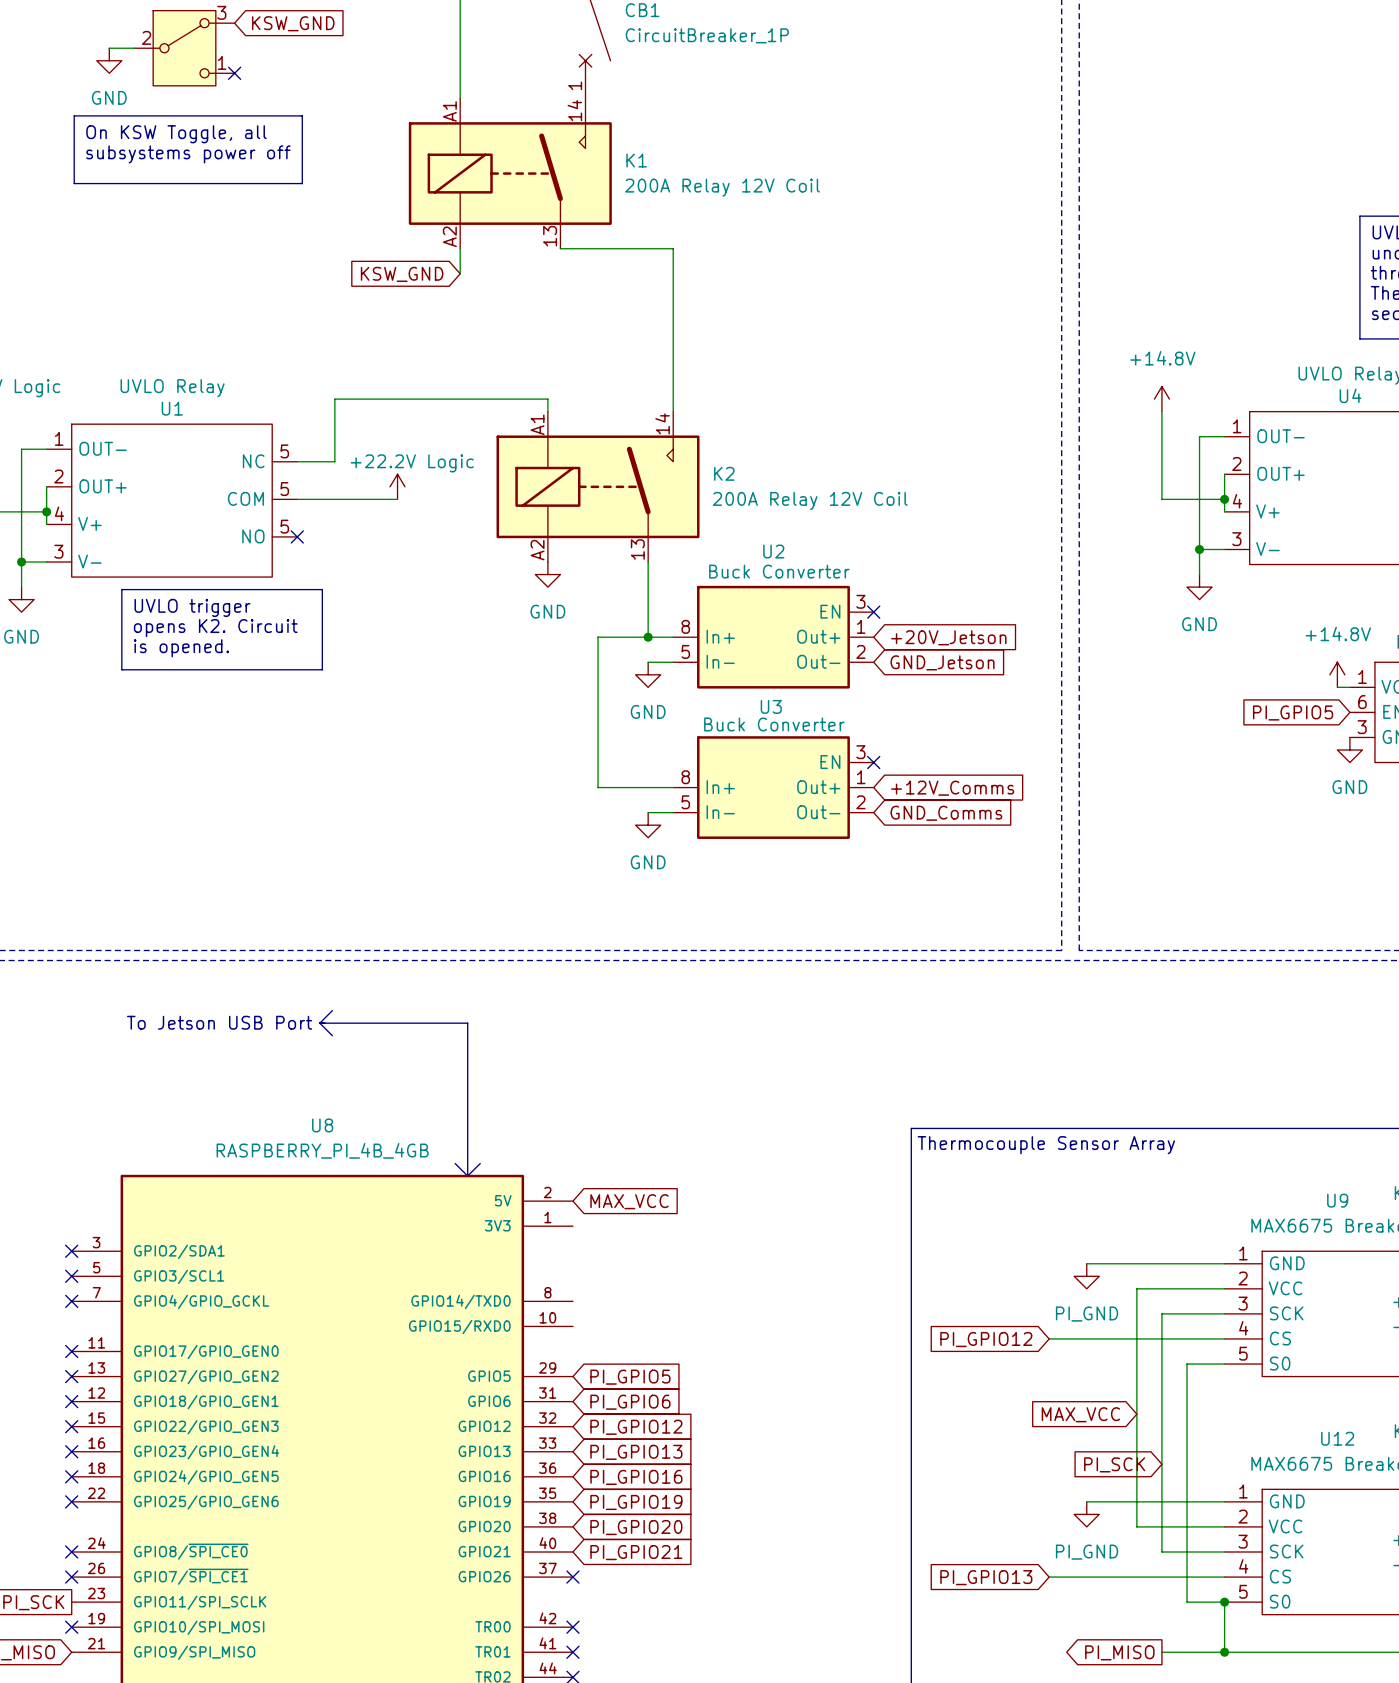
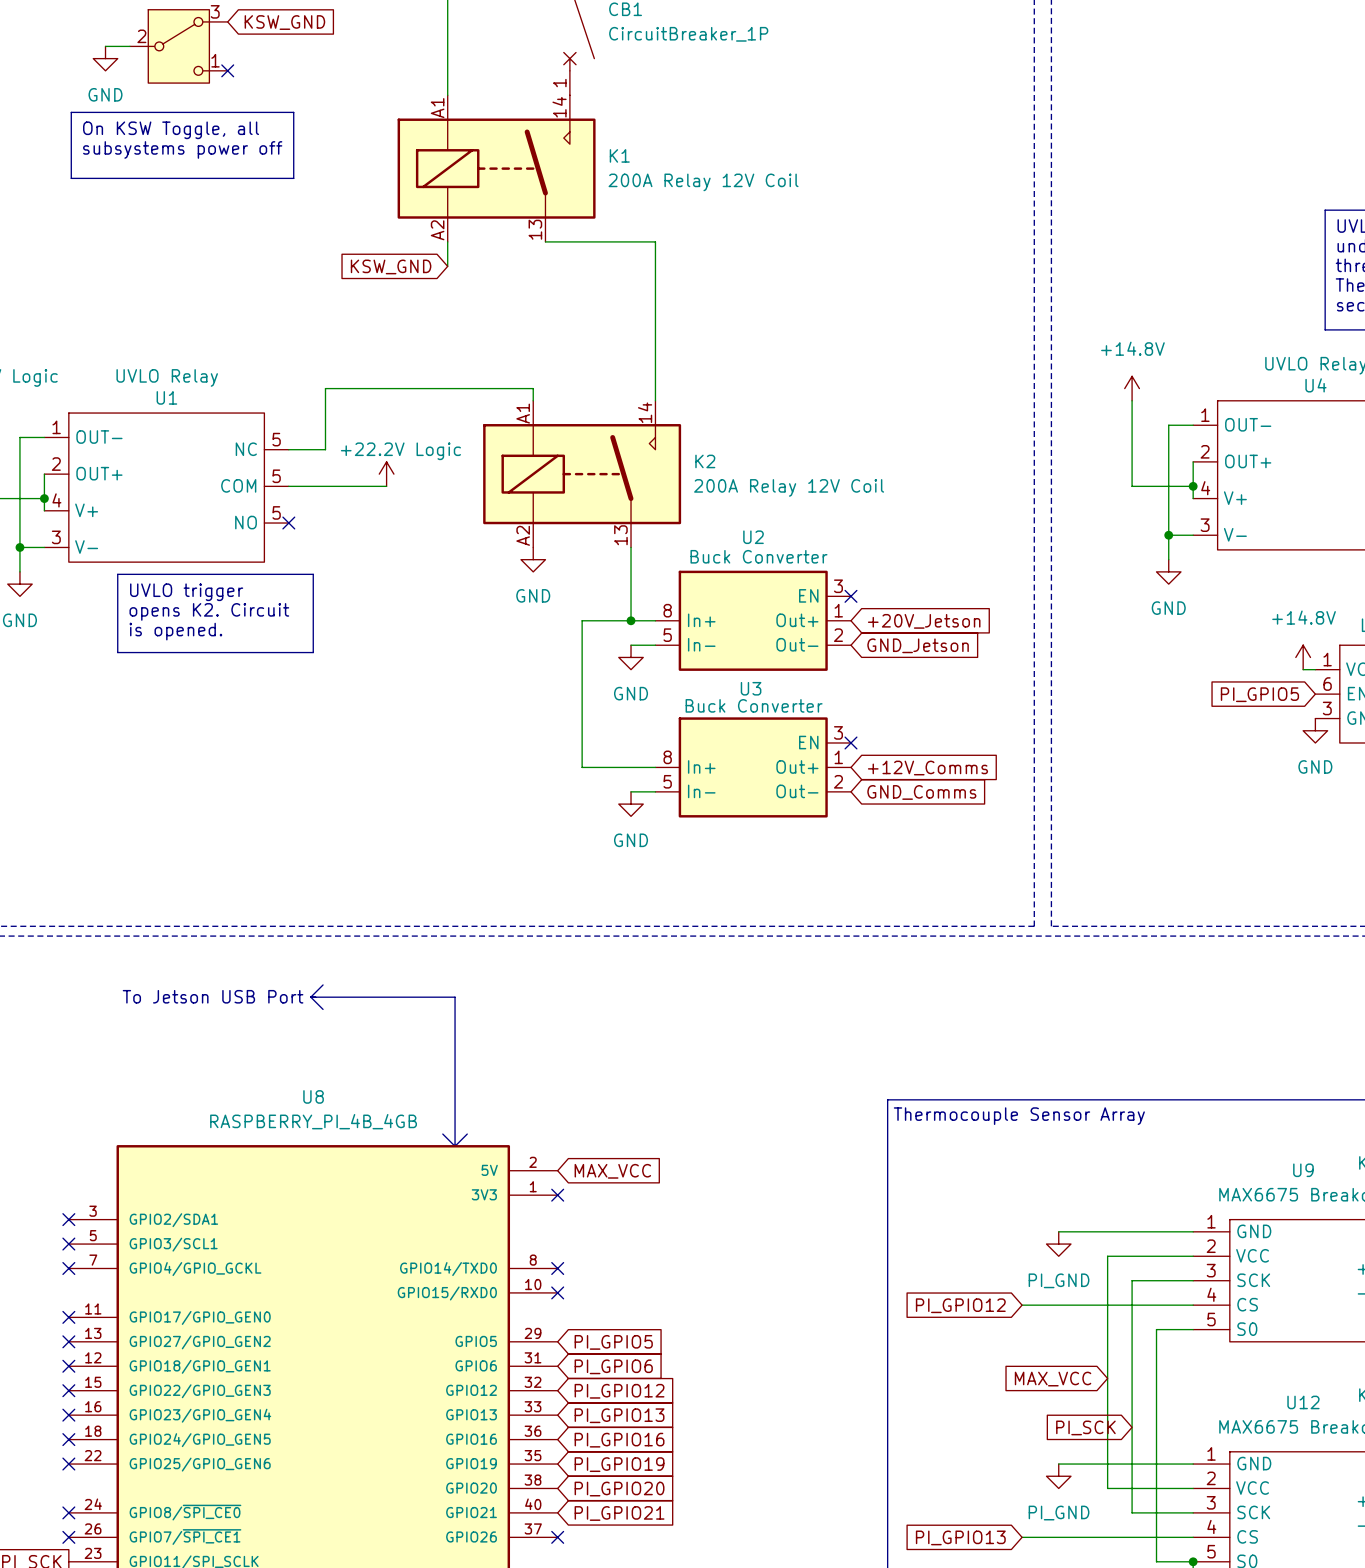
no-connect mark: none -> (557, 1195)
no-connect mark: none -> (557, 1268)
no-connect mark: none -> (557, 1292)

